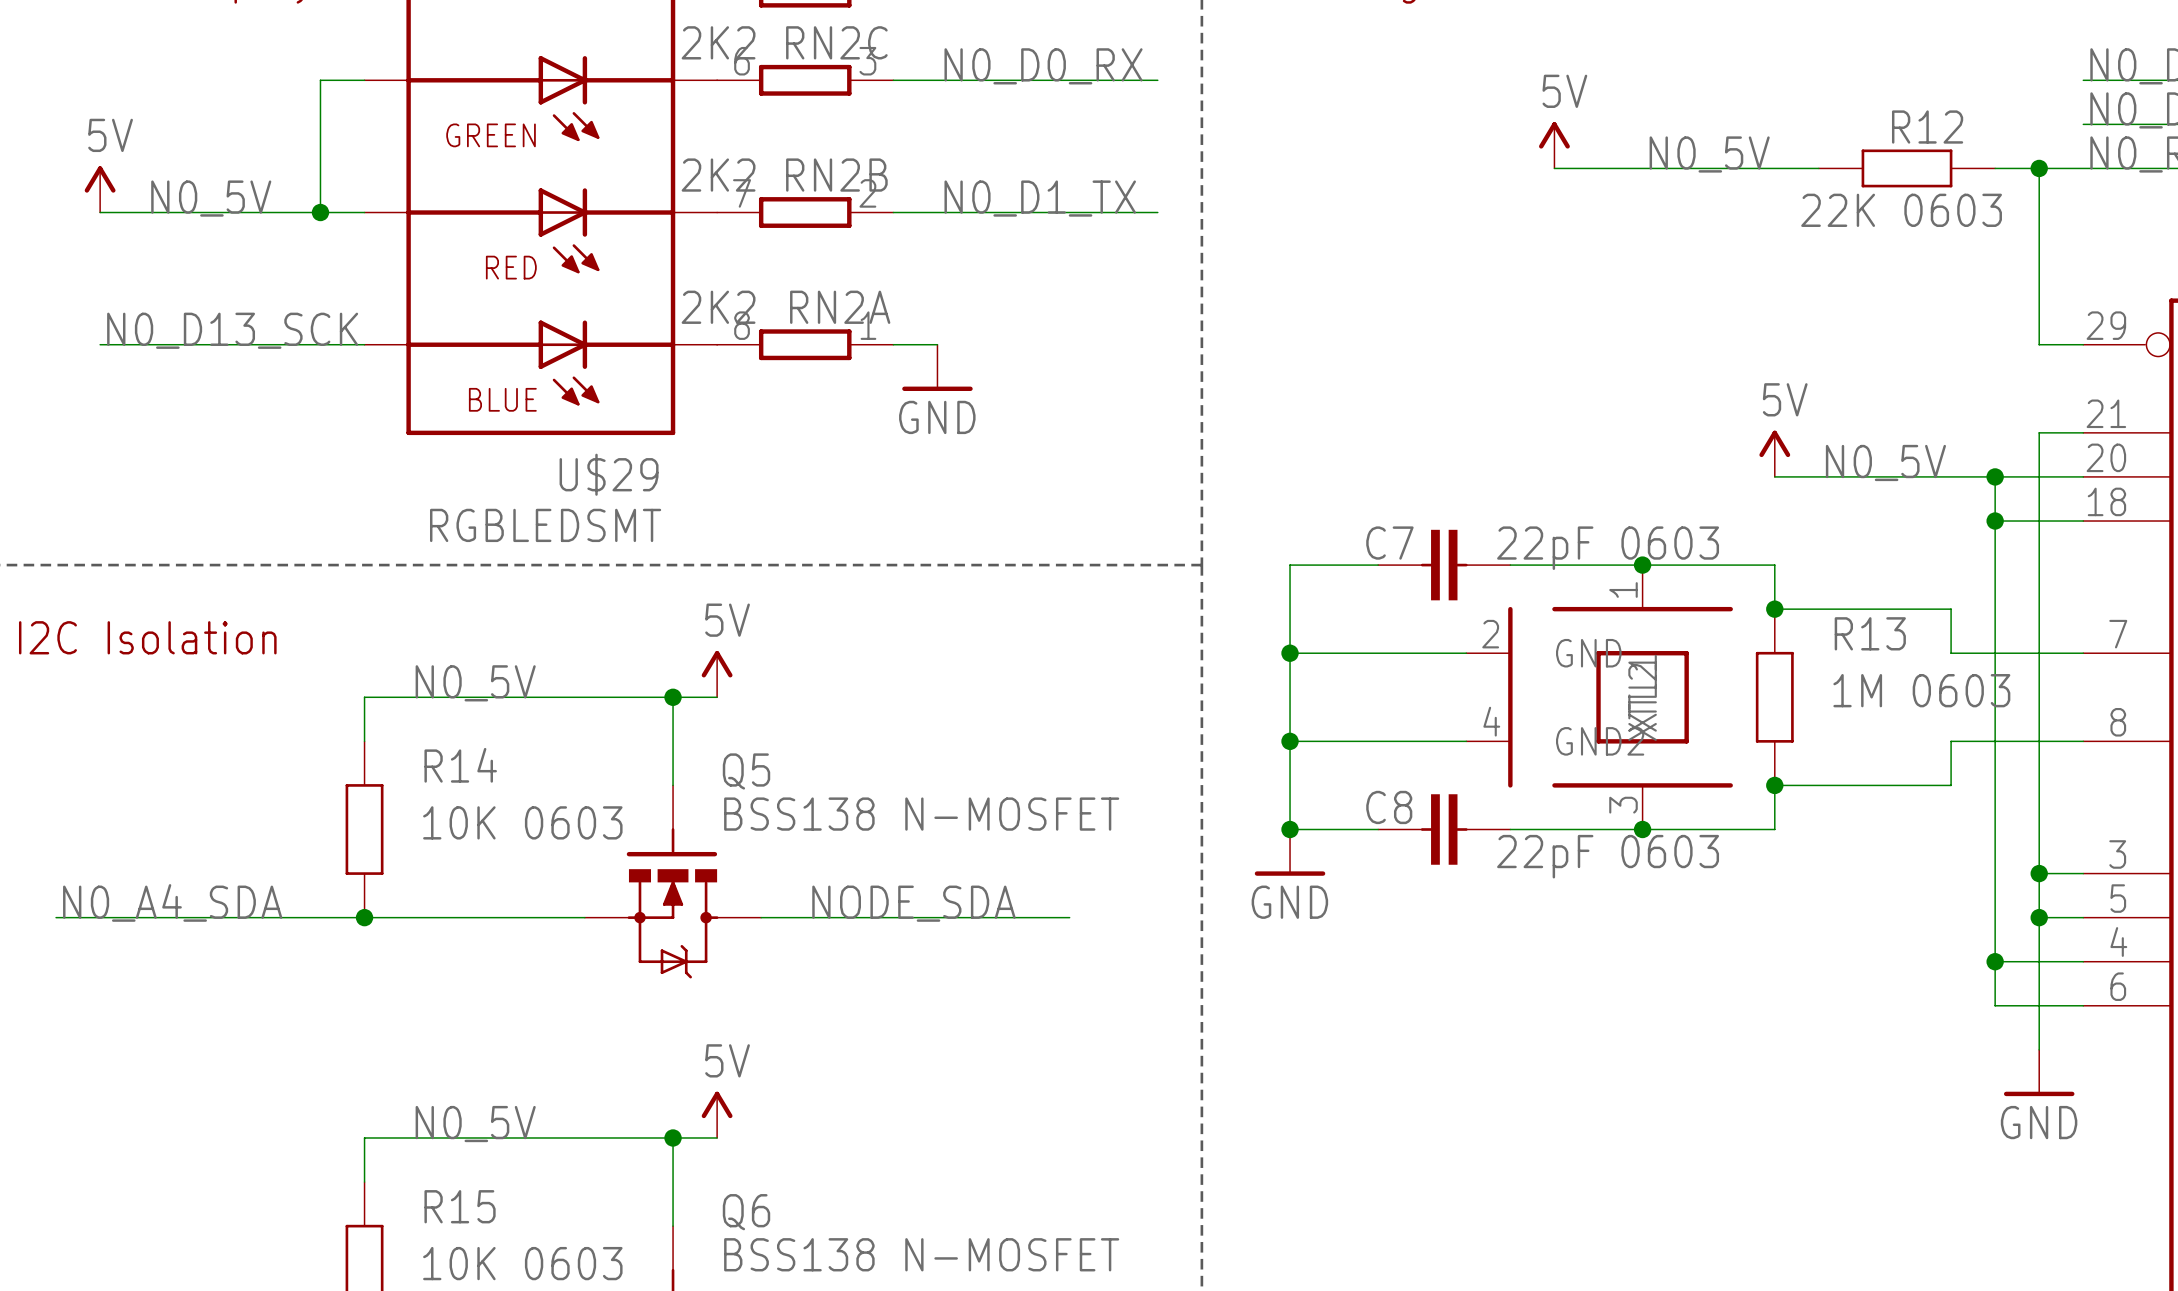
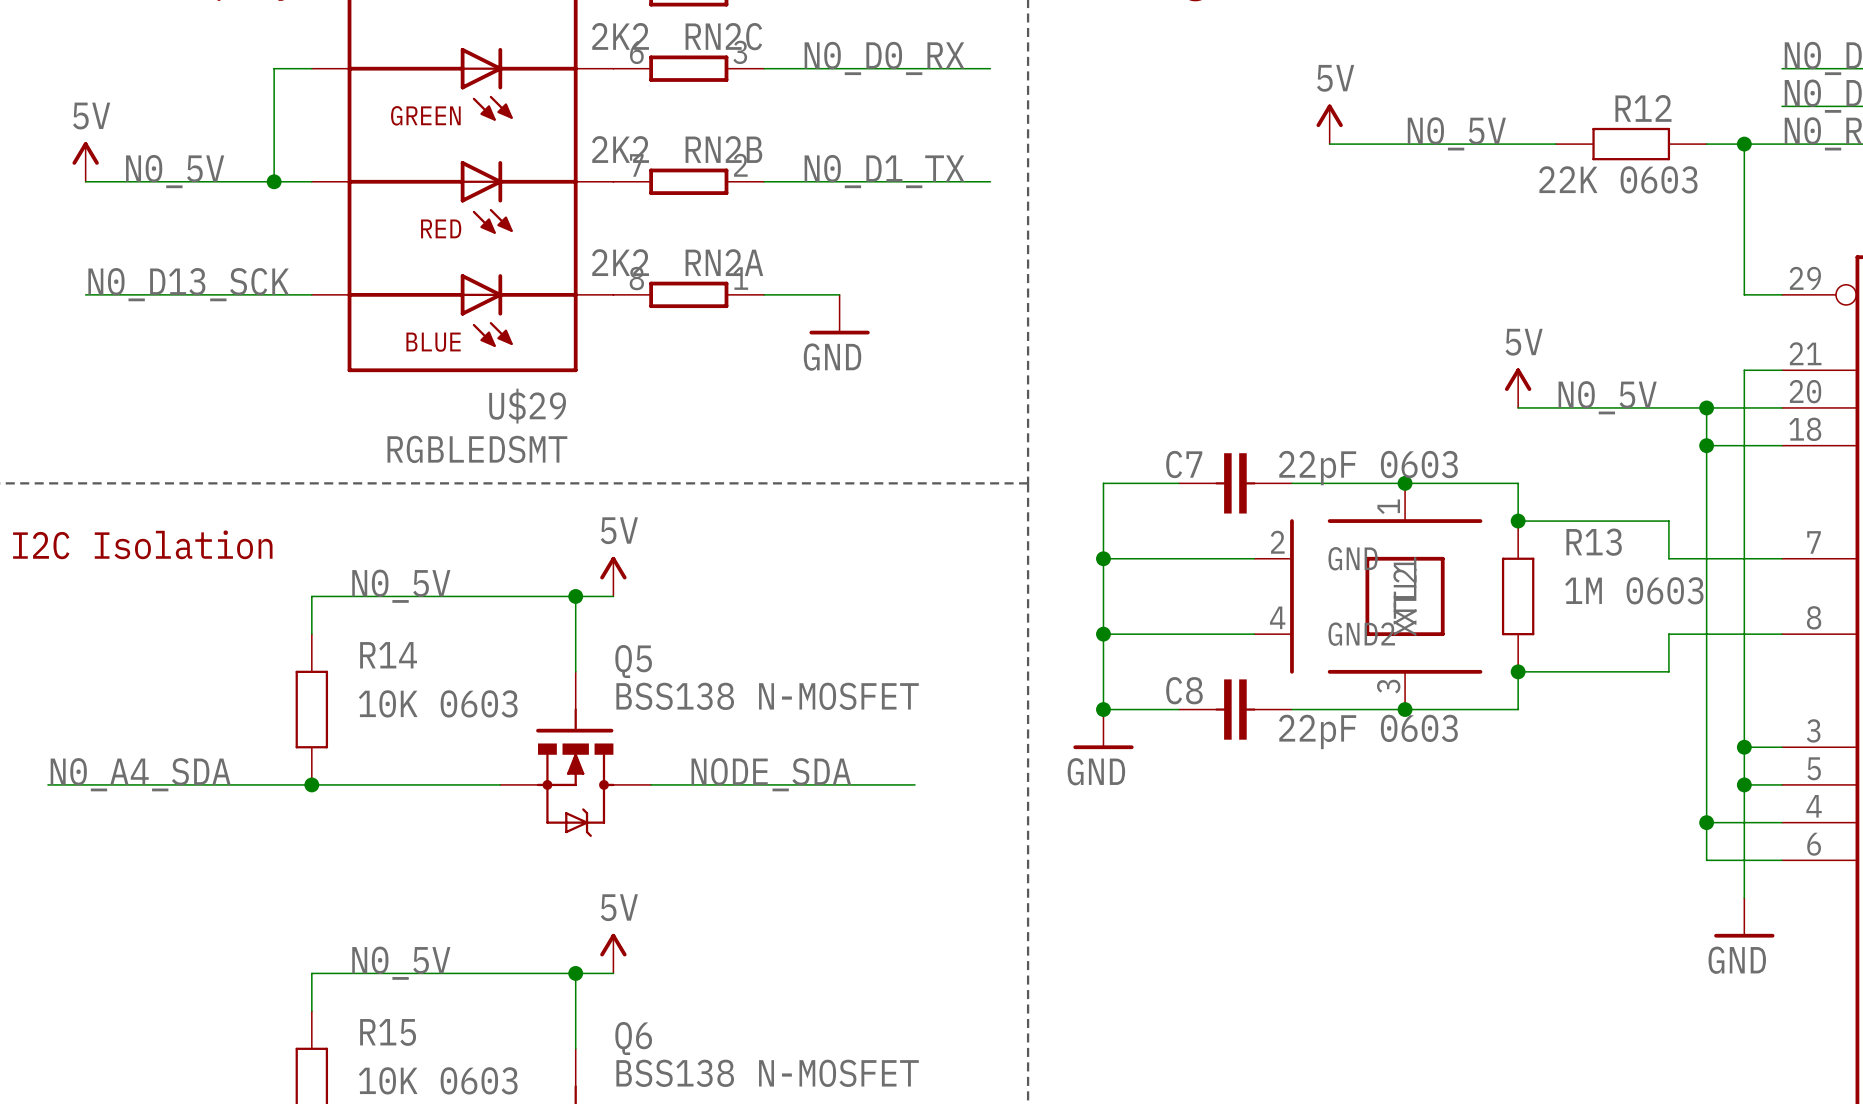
wire: none -> (801, 294) (839, 294)
power symbol position: GND (937, 367) -> GND (839, 314)

